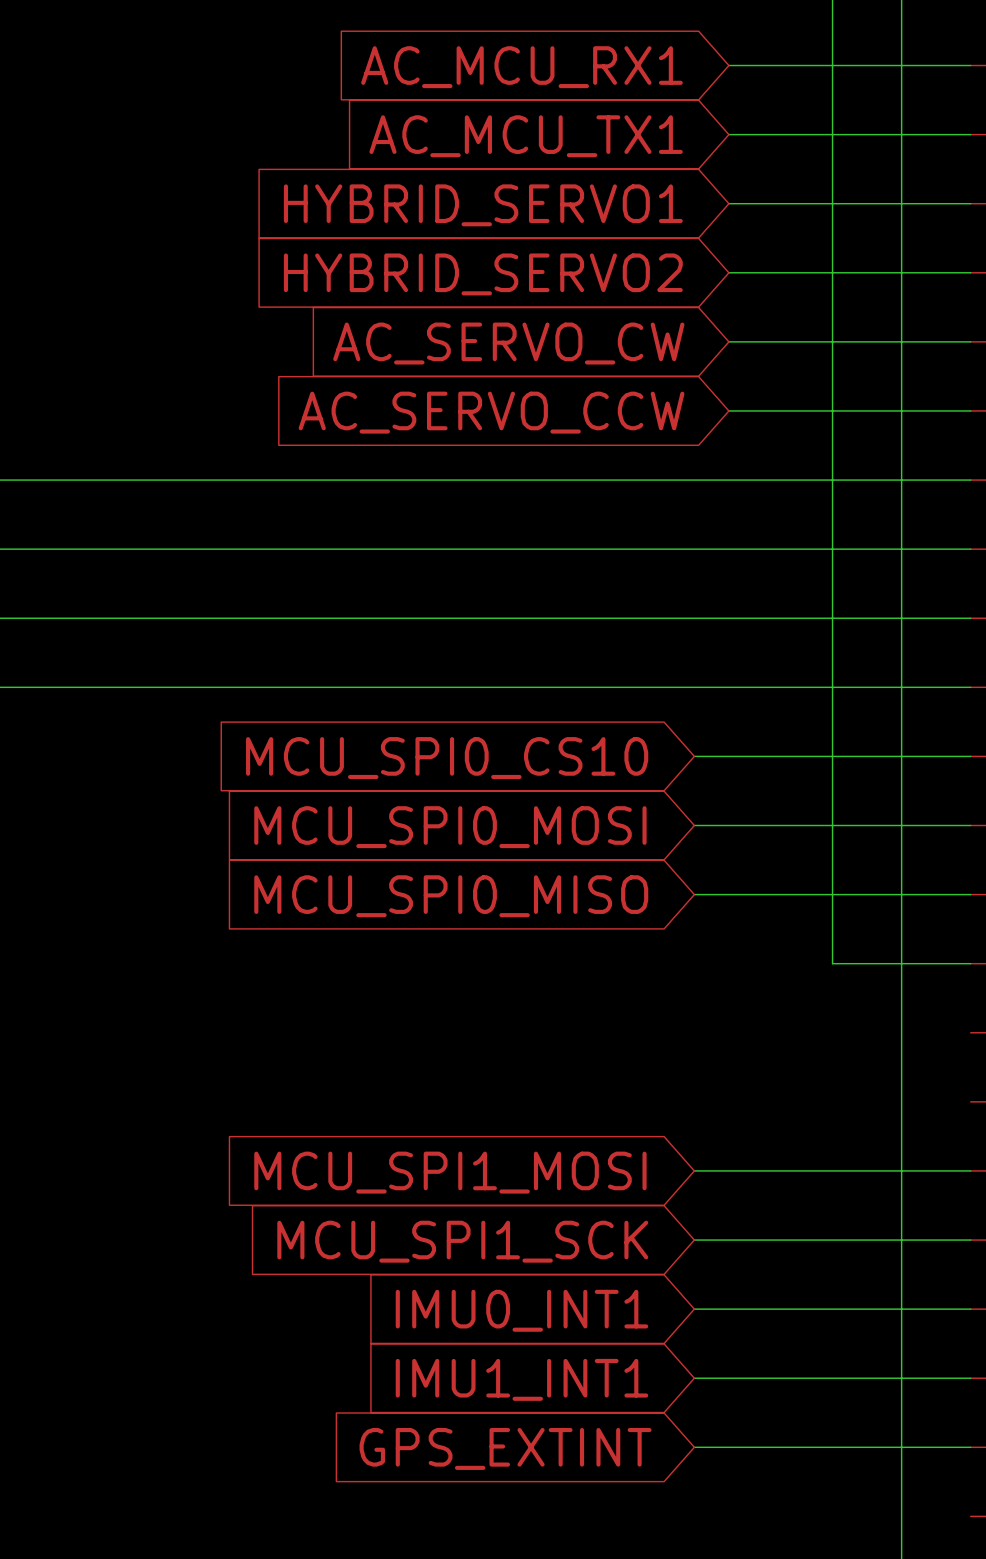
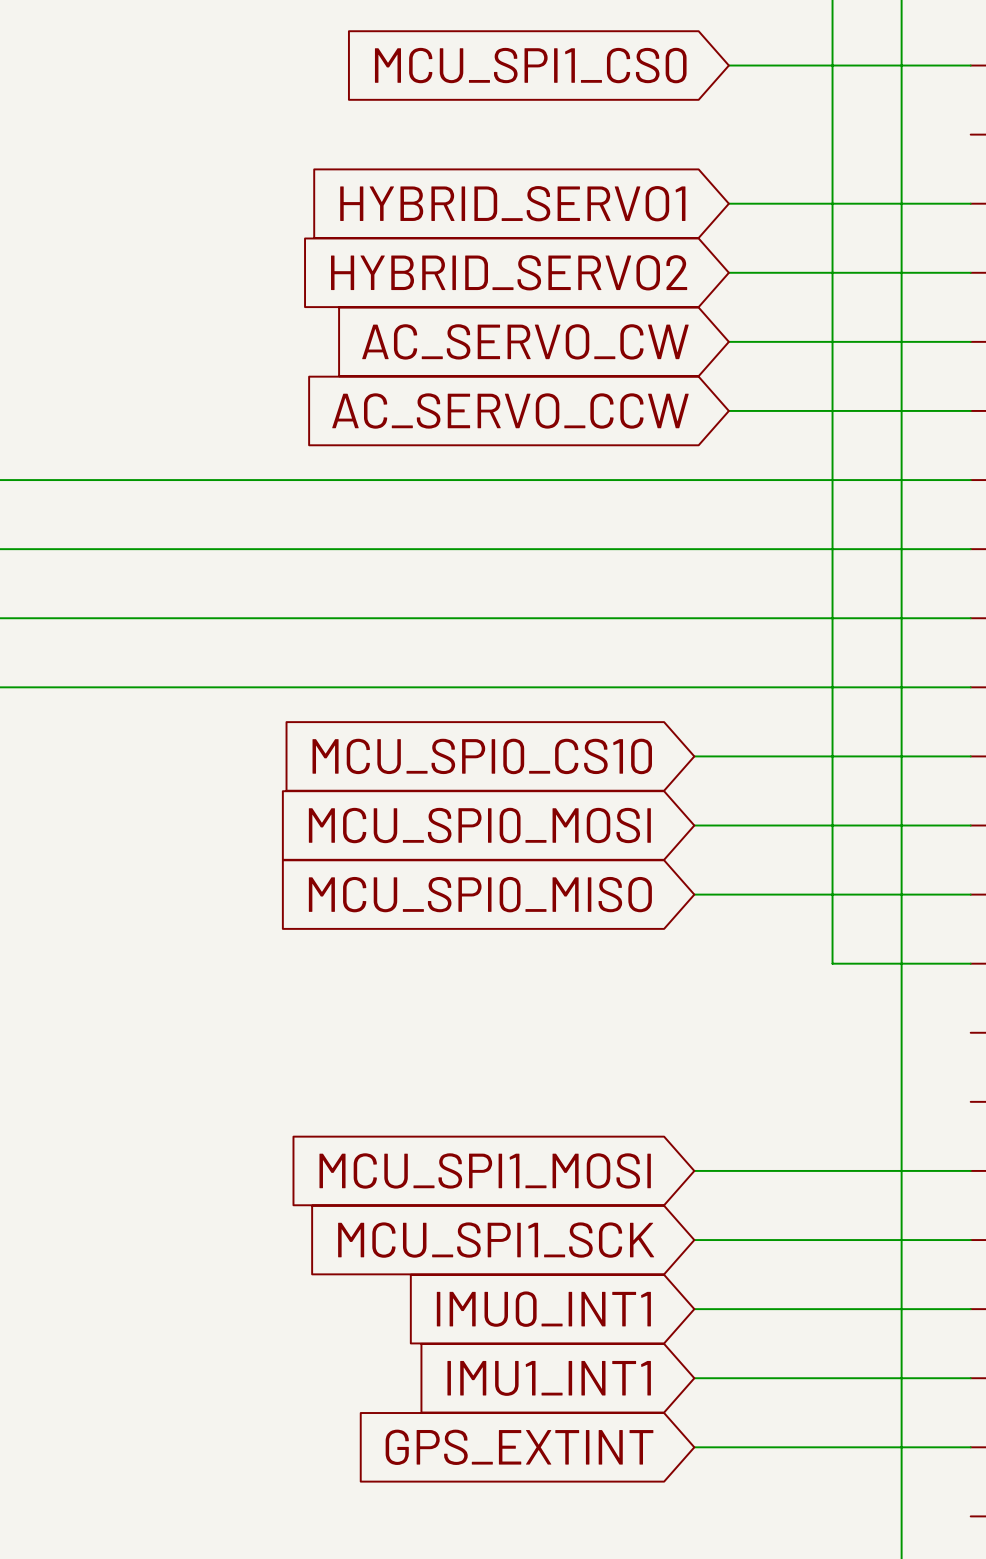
global label: AC_MCU_RX1 (521, 67) -> MCU_SPI1_CS0 (530, 65)
wire: (728, 134) (970, 134) -> none
global label: AC_MCU_TX1 (526, 136) -> none

